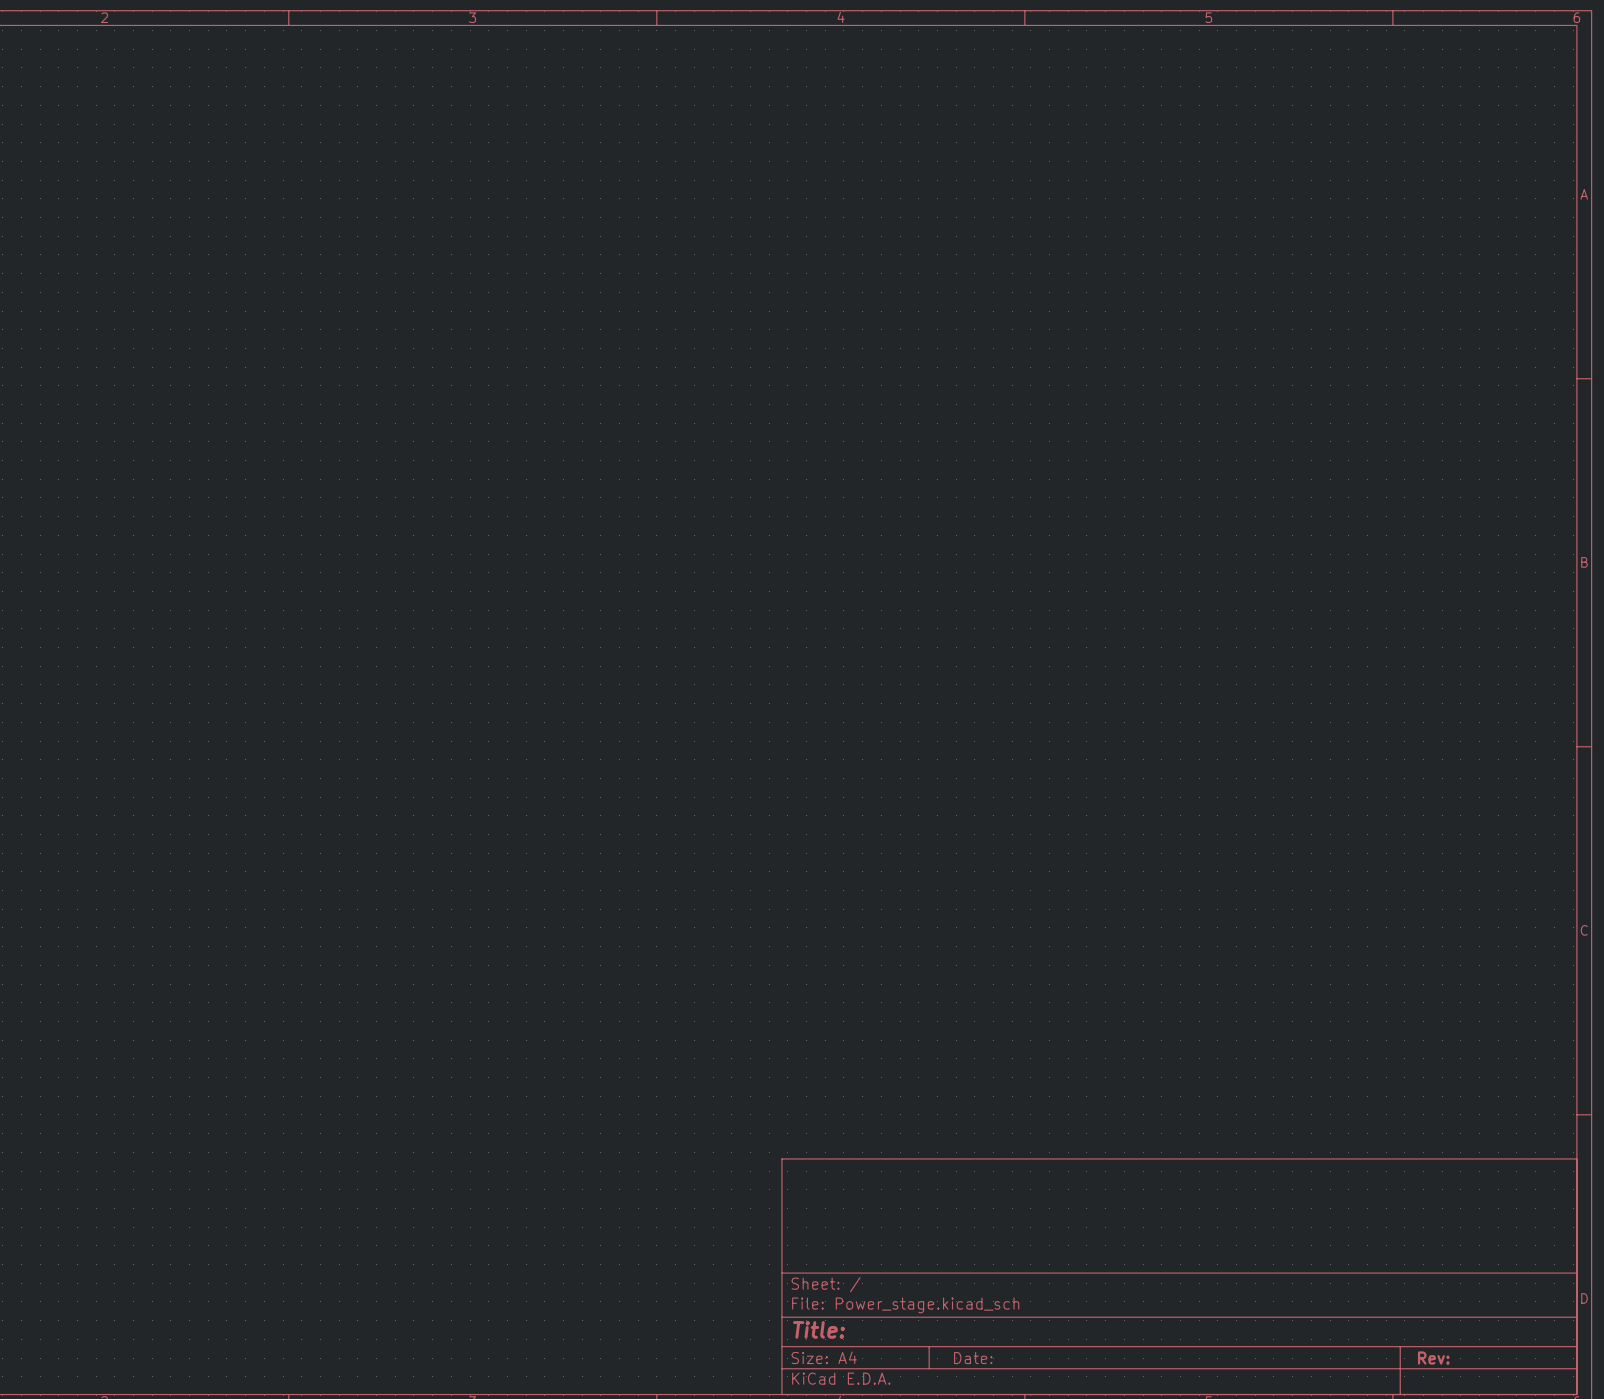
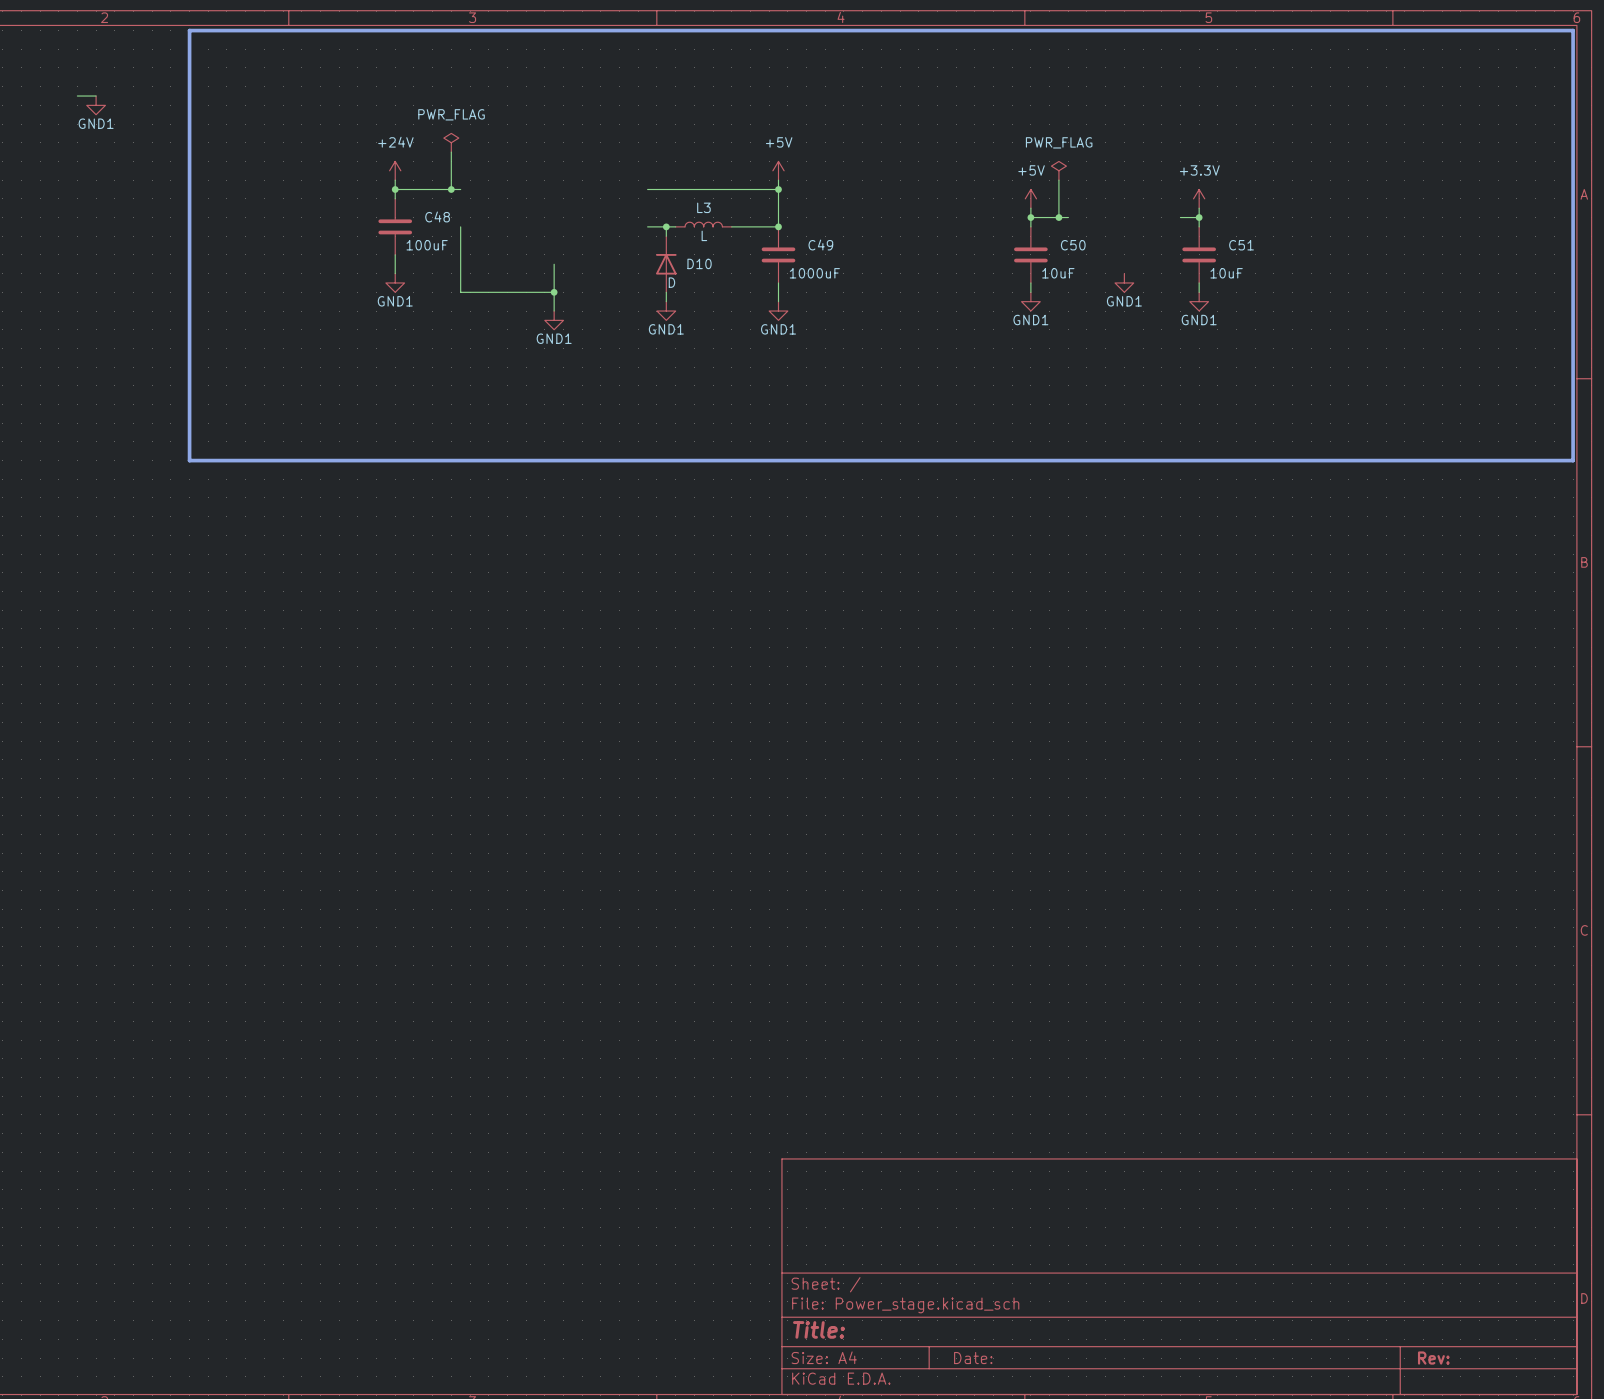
line: none -> (189, 30) (1573, 30) (1573, 460) (189, 460) (189, 30)
wire: none -> (77, 96) (96, 96)
power symbol: none -> GND1 (96, 105)
power symbol: none -> PWR_FLAG (451, 142)
wire: none -> (451, 152) (451, 189)
power symbol: none -> +24V (395, 170)
power symbol: none -> +5V (778, 170)
power symbol: none -> PWR_FLAG (1058, 170)
wire: none -> (395, 180) (395, 198)
wire: none -> (778, 180) (778, 226) (731, 226)
wire: none -> (1058, 180) (1058, 217)
wire: none -> (395, 189) (460, 189)
junction: none -> (395, 189)
junction: none -> (451, 189)
wire: none -> (647, 189) (778, 189)
junction: none -> (778, 189)
power symbol: none -> +5V (1030, 198)
power symbol: none -> +3.3V (1199, 198)
wire: none -> (1030, 208) (1030, 226)
wire: none -> (1199, 208) (1199, 226)
wire: none -> (1030, 217) (1068, 217)
junction: none -> (1030, 217)
junction: none -> (1058, 217)
wire: none -> (1180, 217) (1199, 217)
junction: none -> (1199, 217)
L3: none -> L (703, 224)
C48: none -> 100uF (395, 226)
wire: none -> (460, 226) (460, 292) (554, 292)
wire: none -> (647, 226) (675, 226)
wire: none -> (666, 226) (666, 236)
junction: none -> (666, 226)
junction: none -> (778, 226)
wire: none -> (395, 254) (395, 273)
C49: none -> 1000uF (778, 254)
C50: none -> 10uF (1030, 254)
C51: none -> 10uF (1199, 254)
wire: none -> (554, 264) (554, 311)
D10: none -> D (666, 264)
power symbol: none -> GND1 (395, 282)
wire: none -> (778, 282) (778, 301)
wire: none -> (1030, 282) (1030, 292)
power symbol: none -> GND1 (1124, 282)
wire: none -> (1199, 282) (1199, 292)
junction: none -> (554, 292)
wire: none -> (666, 292) (666, 301)
power symbol: none -> GND1 (1030, 301)
power symbol: none -> GND1 (1199, 301)
power symbol: none -> GND1 (666, 311)
power symbol: none -> GND1 (778, 311)
power symbol: none -> GND1 (554, 320)

